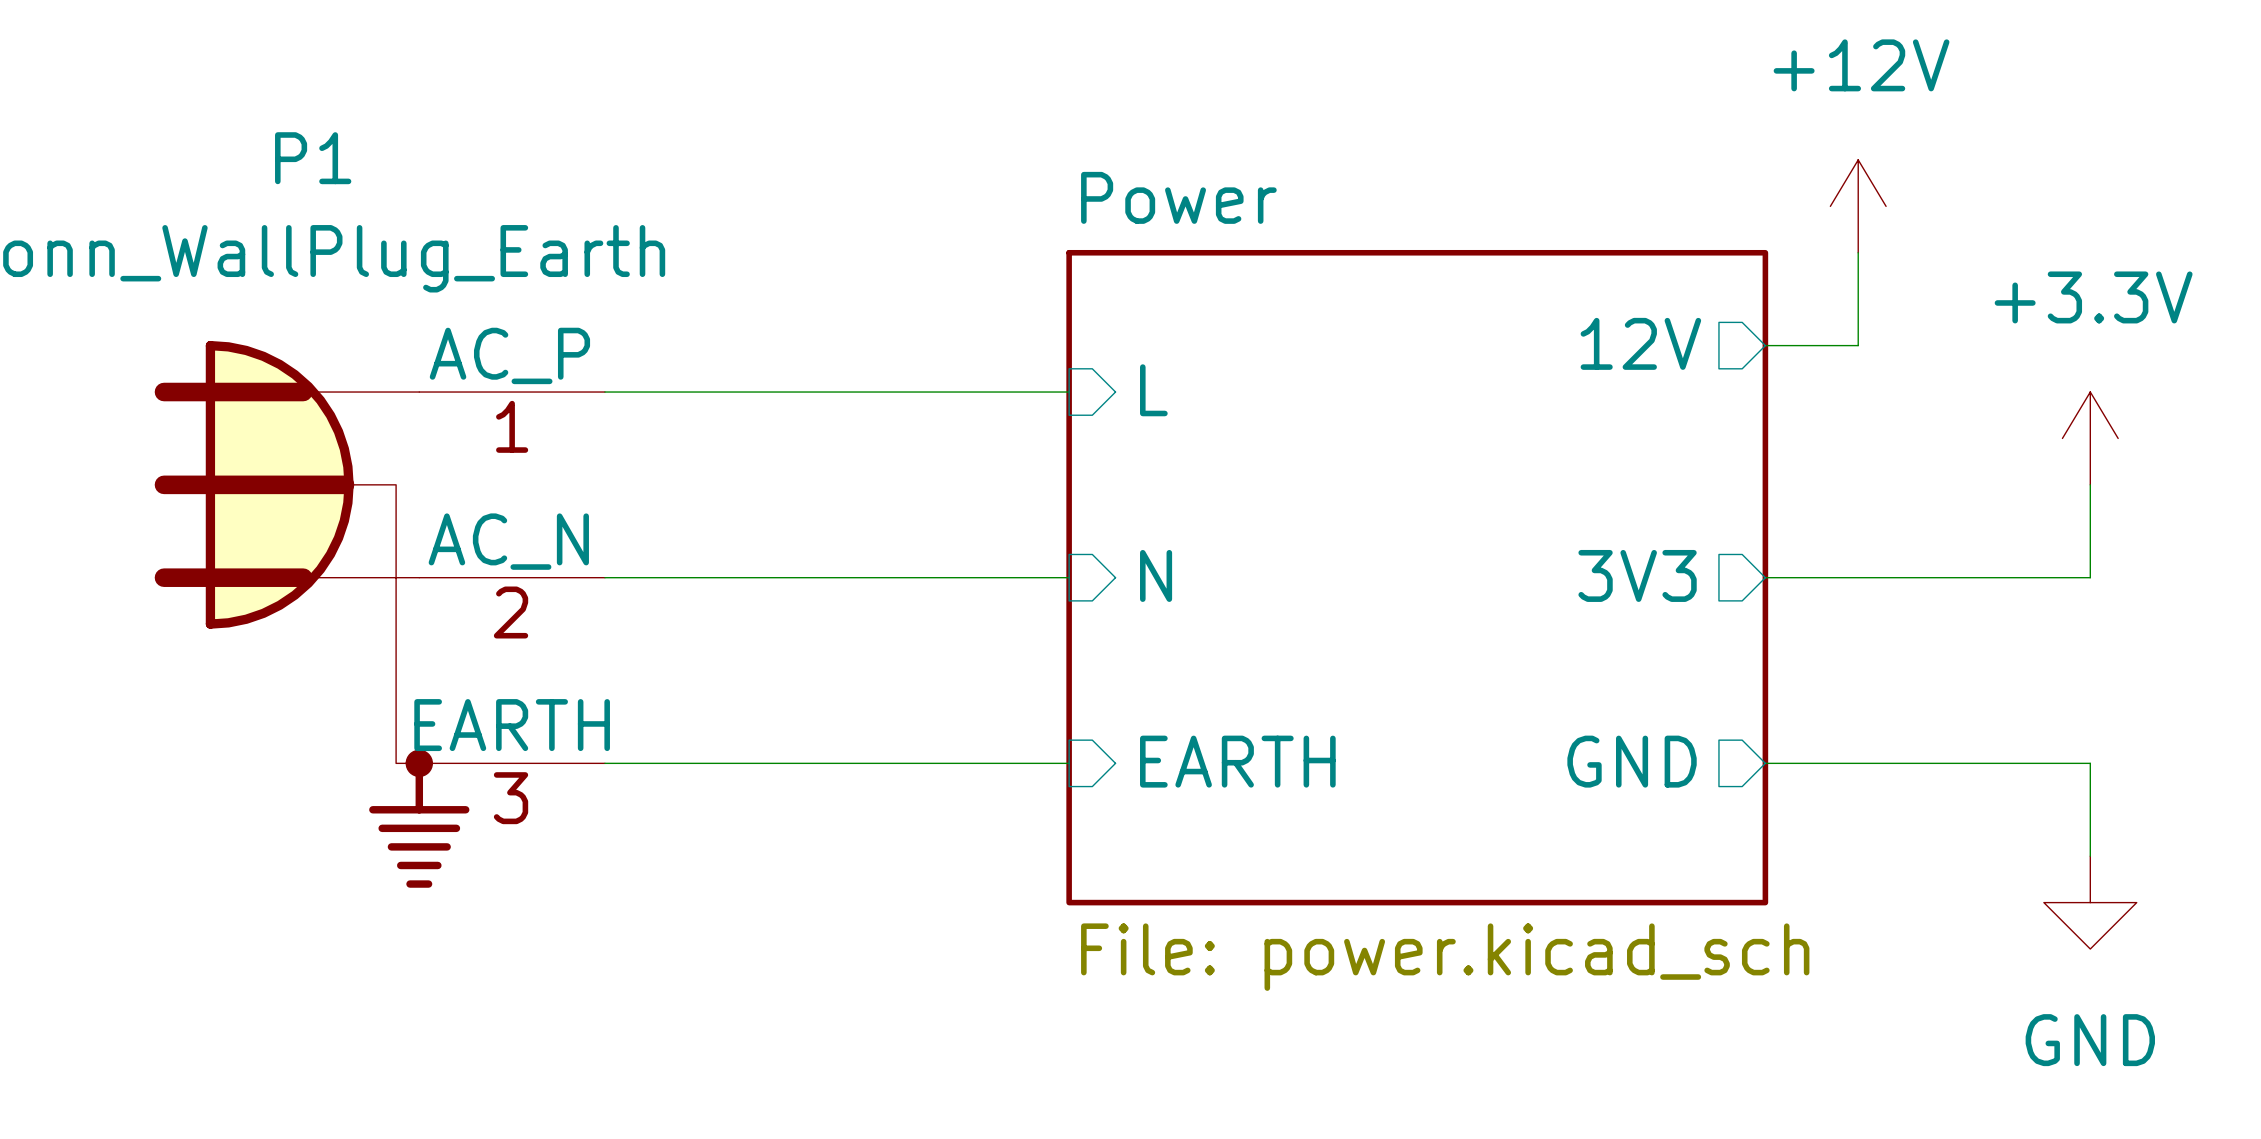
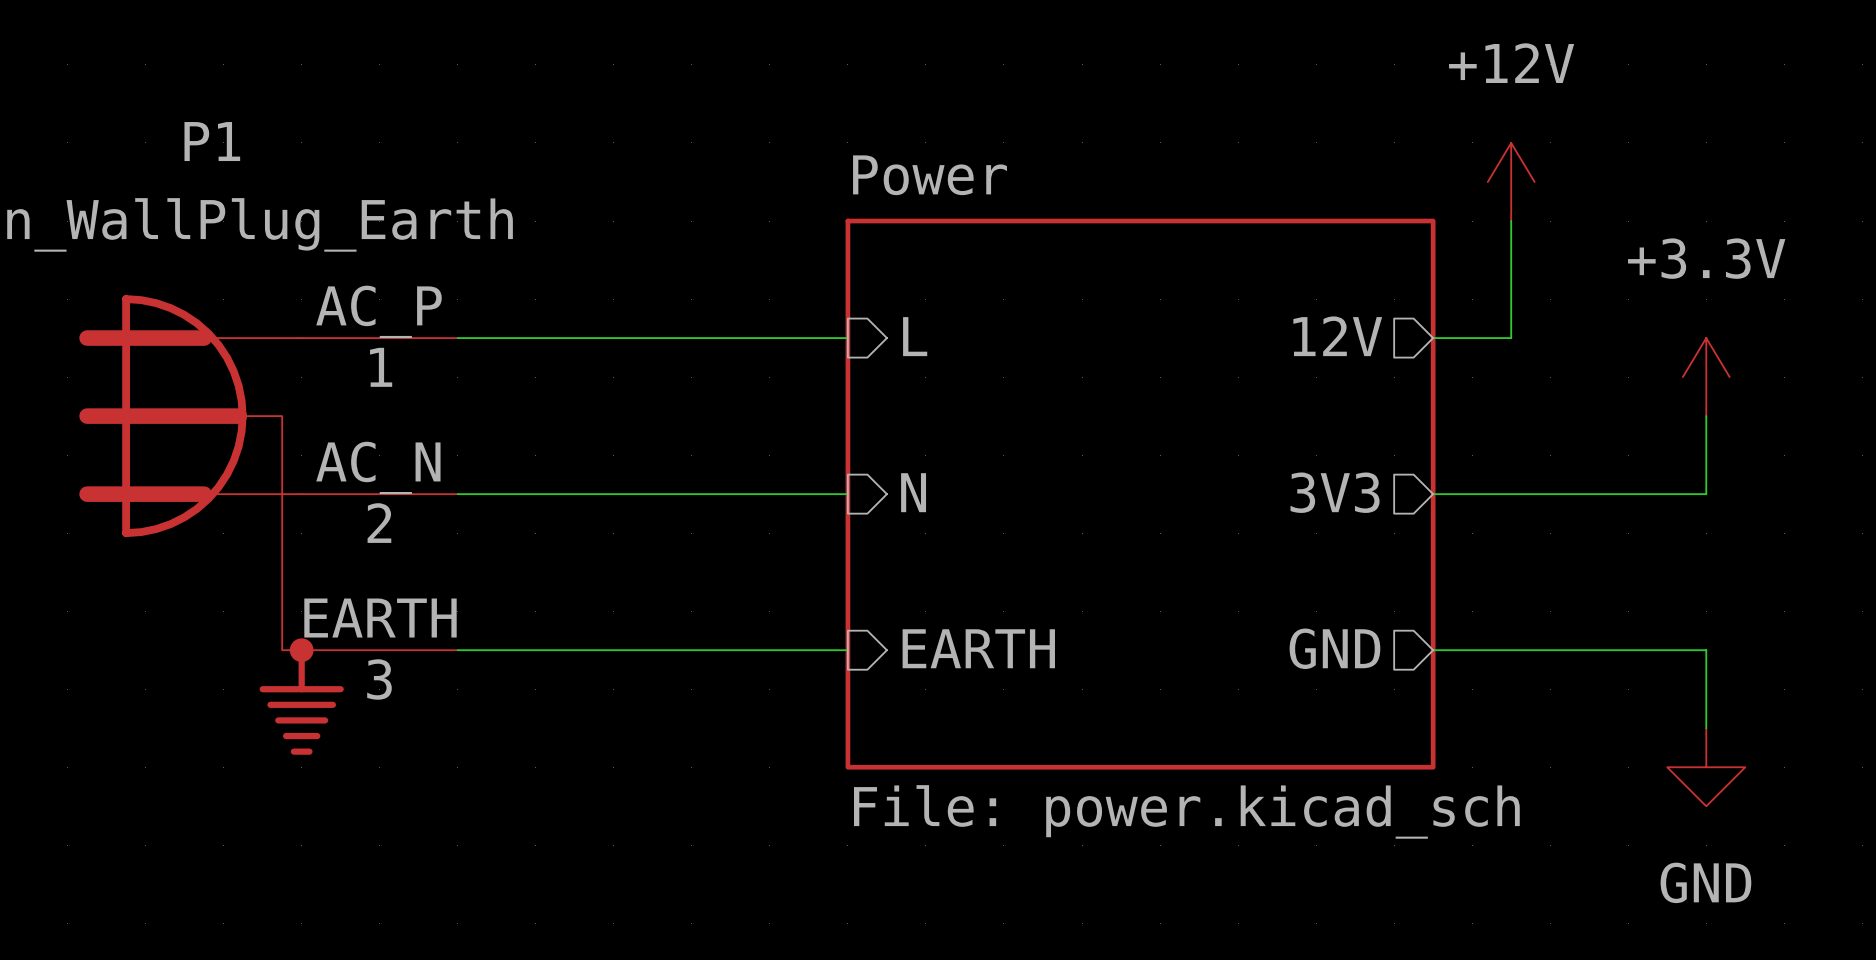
sheet pin position: 12V (1640, 343) -> 12V (1337, 336)
wire: (1765, 345) (1858, 345) -> (1433, 338) (1511, 338) (1511, 299)

